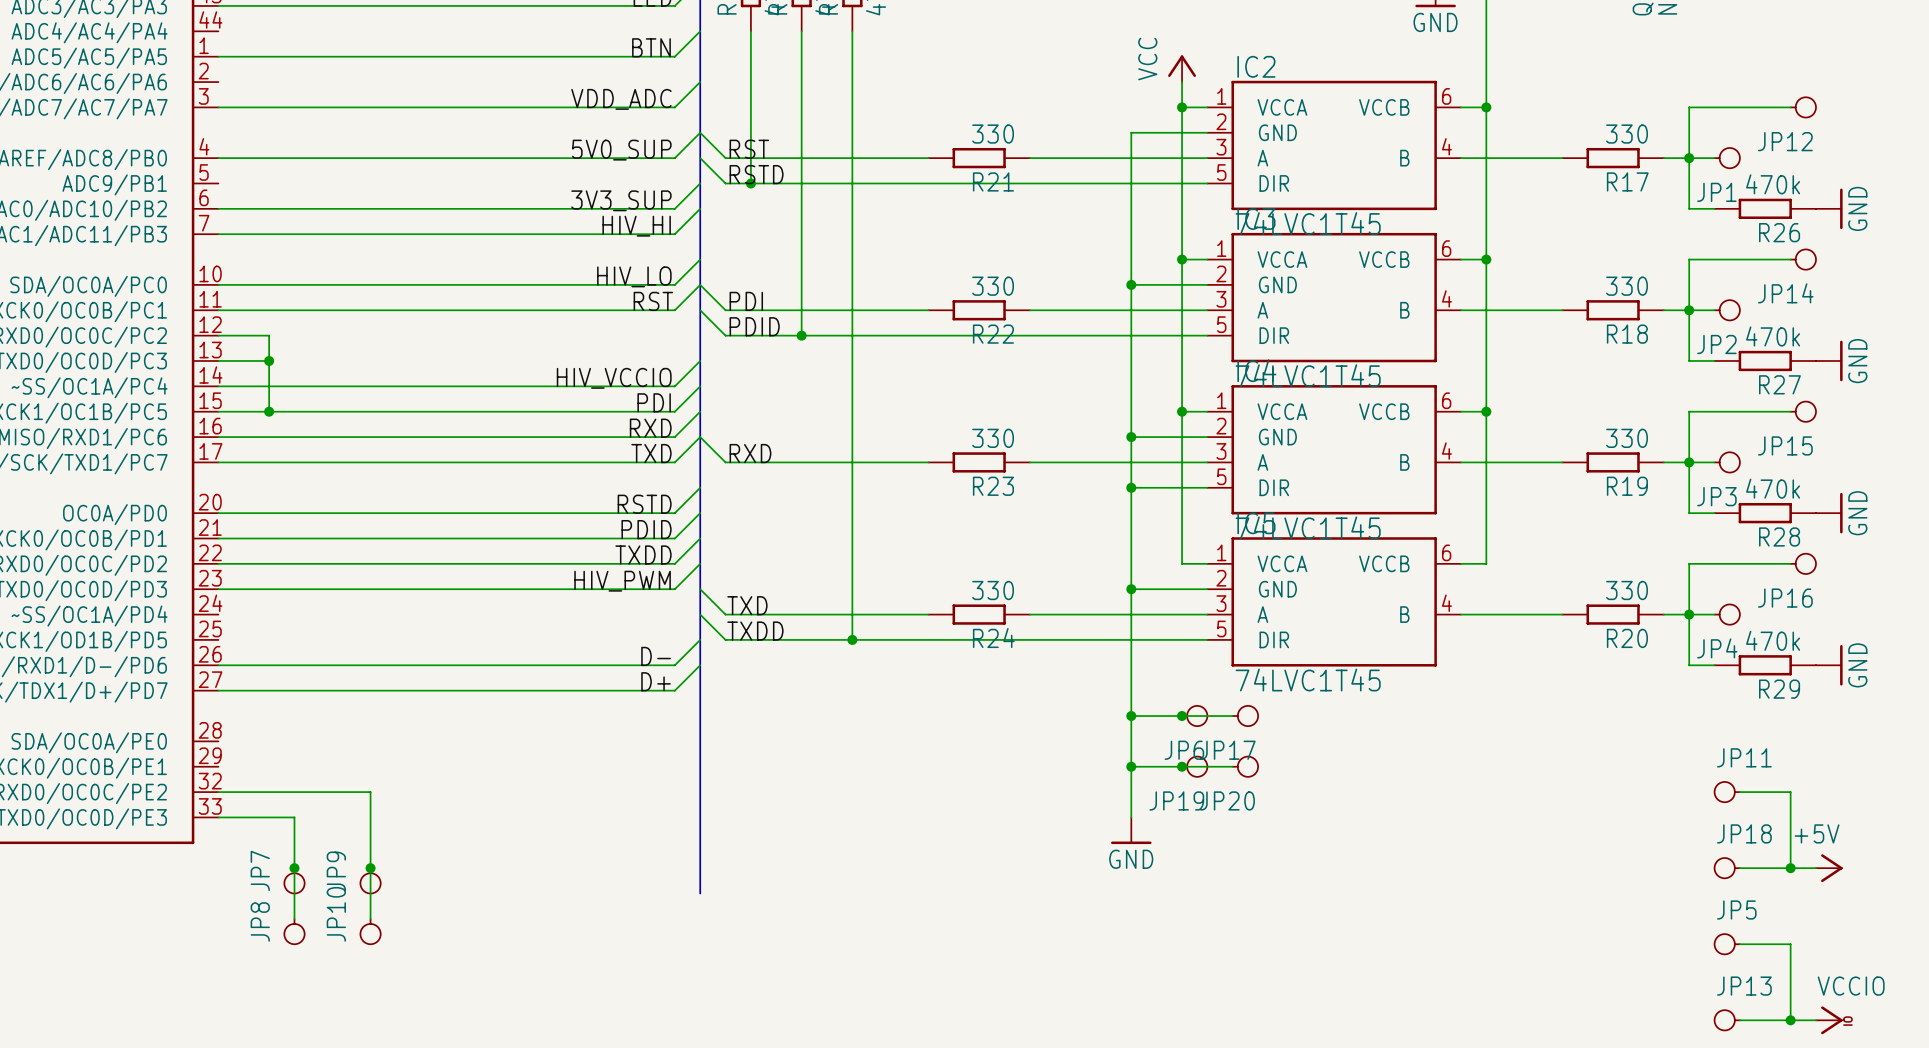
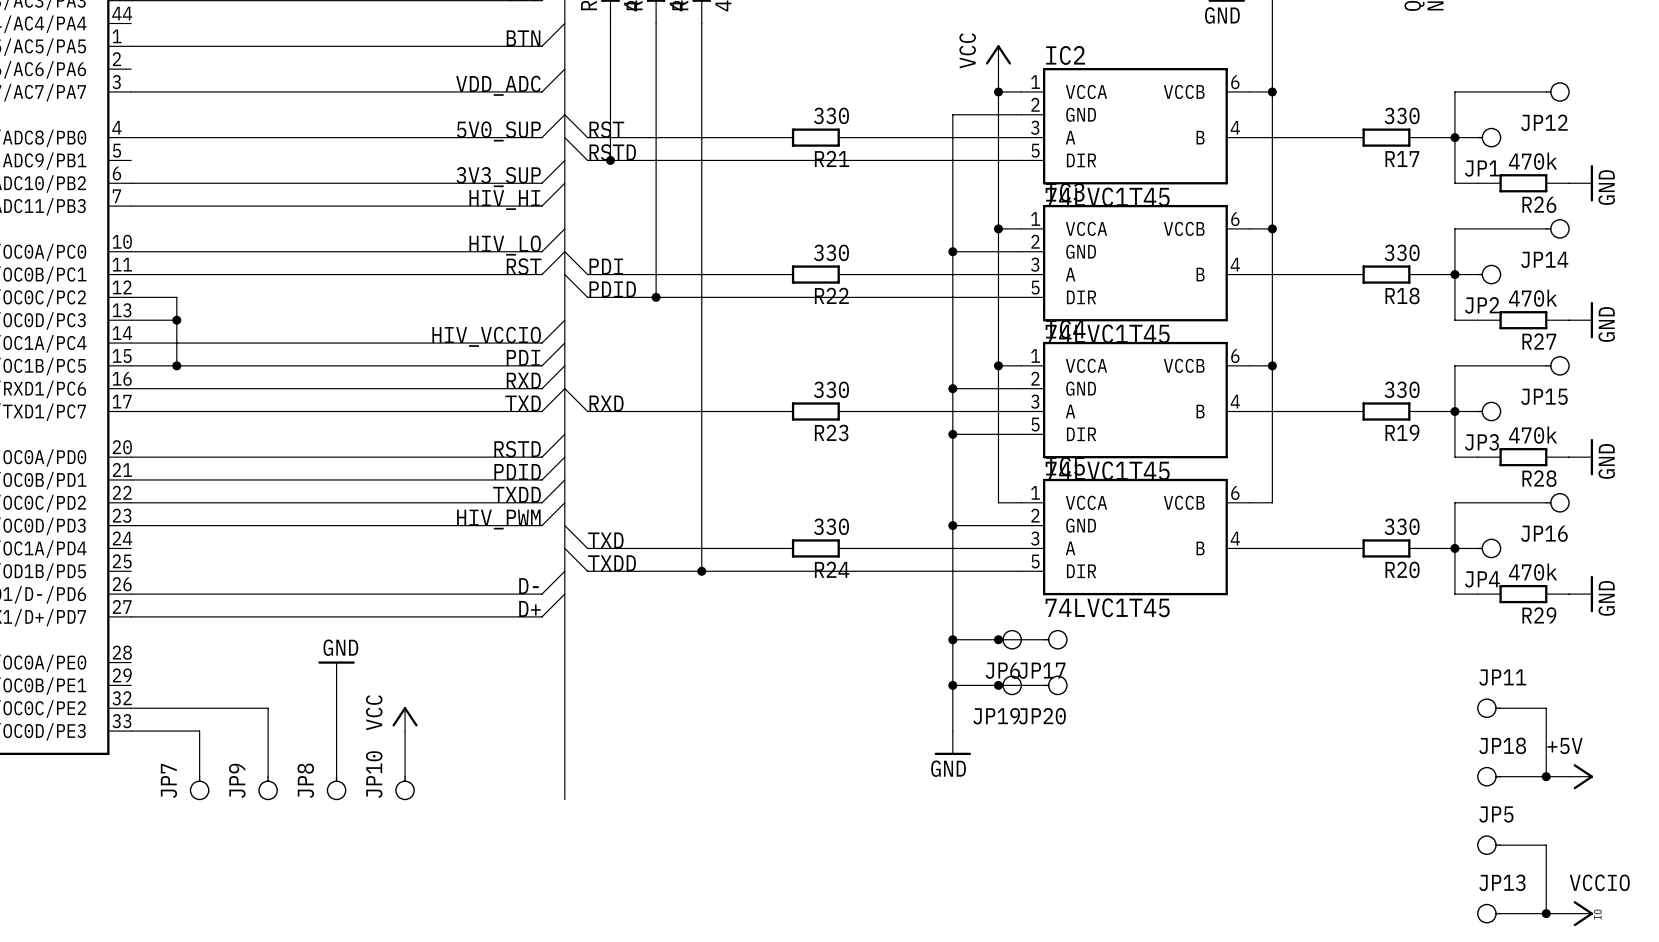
power symbol: none -> GND (336, 673)
wire: none -> (336, 685) (336, 776)
power symbol: none -> VCC (405, 719)
wire: (294, 868) (294, 918) -> none
junction: (294, 868) -> none
wire: (370, 868) (370, 918) -> (405, 731) (405, 776)
junction: (370, 868) -> none
JP8 position: (294, 931) -> (336, 788)
JP10 position: (370, 931) -> (405, 788)

